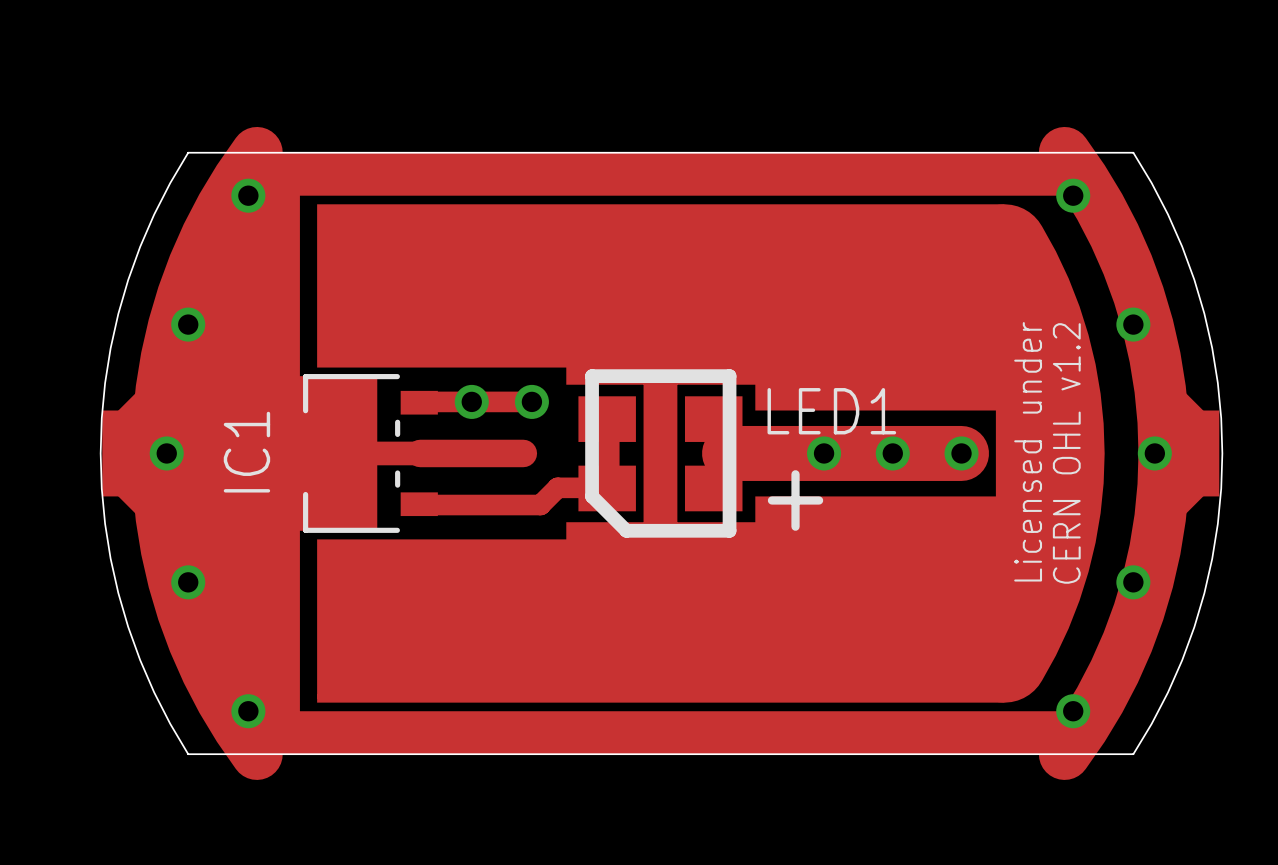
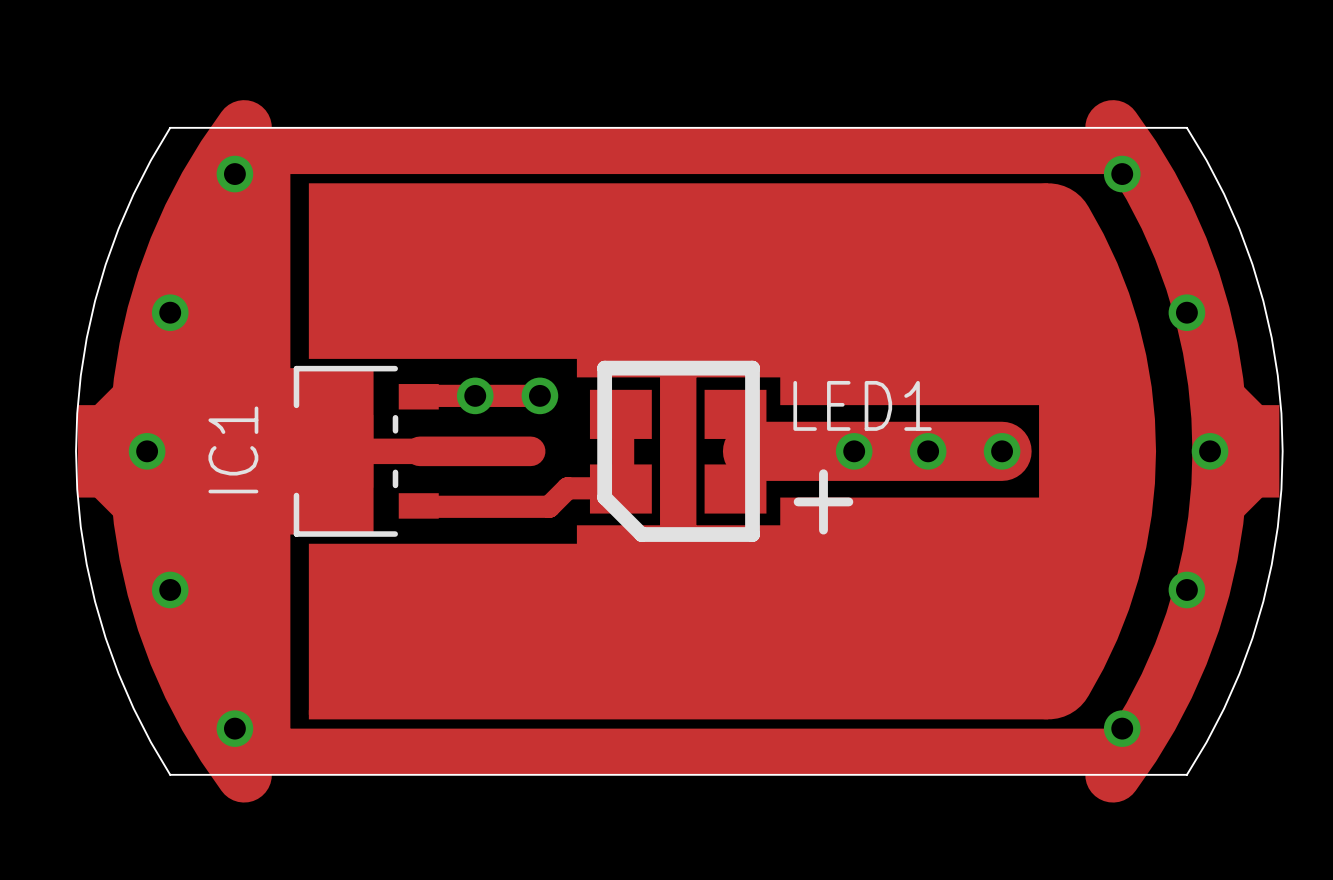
text: Licensed under (1028, 451) -> none
text: CERN OHL v1.2 (1066, 453) -> none

